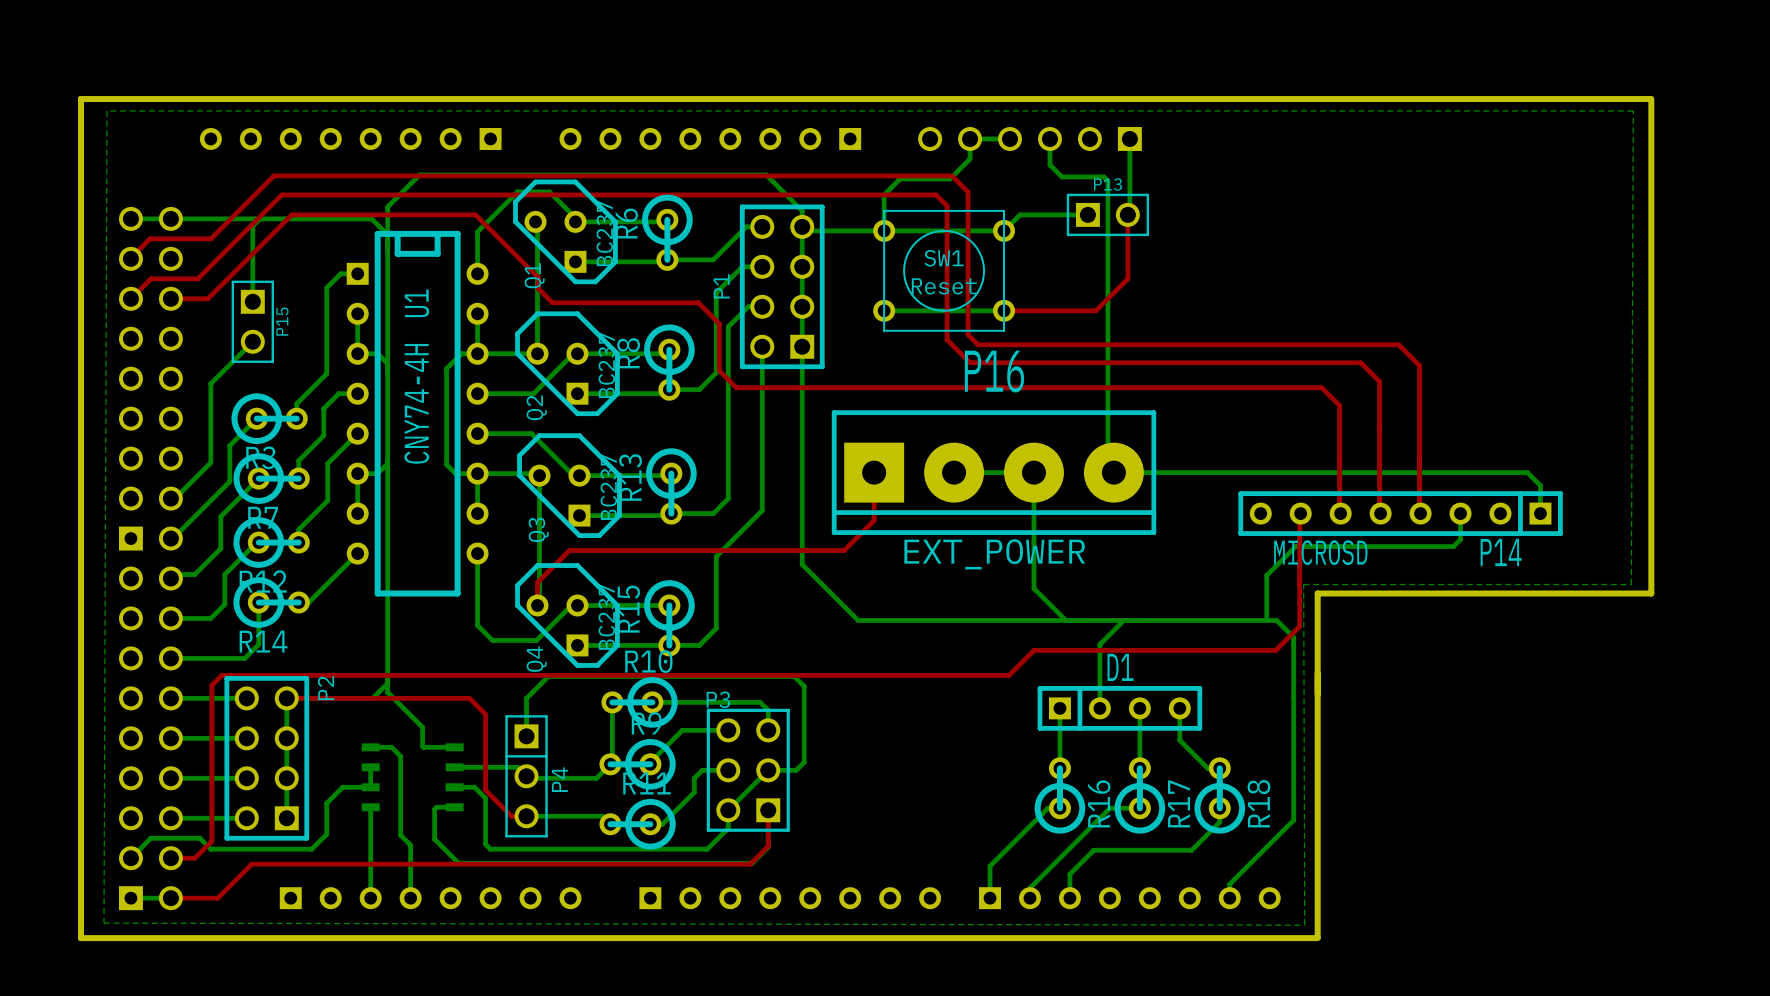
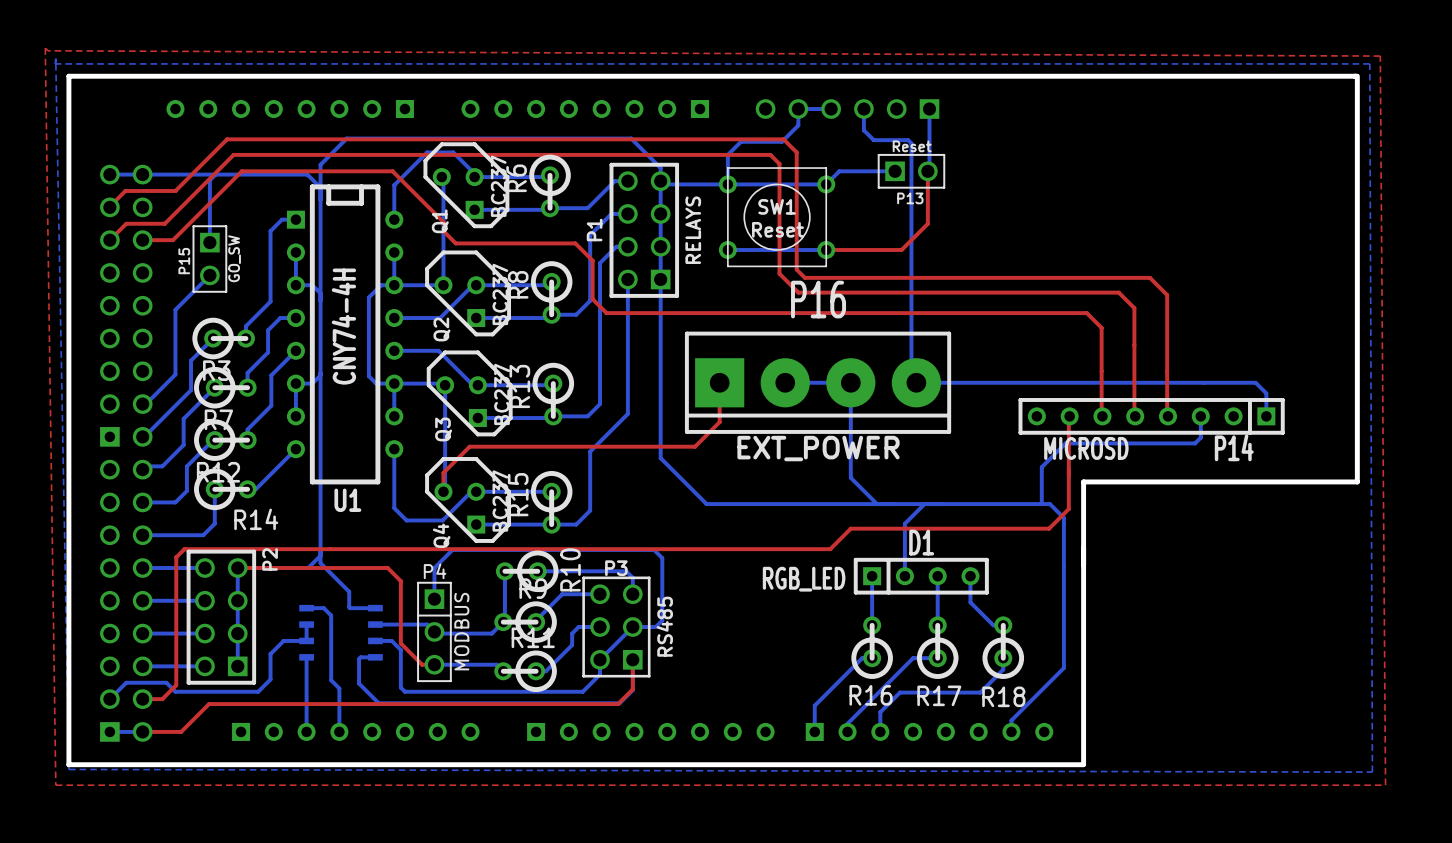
top zone outline: none -> (45, 48) (47, 50) (1380, 56) (1385, 785) (55, 785) (45, 48)
bottom zone outline: (106, 111) (1633, 111) (1631, 584) (1303, 584) (1304, 925) (103, 923) (106, 111) -> (55, 58) (55, 63) (1369, 63) (1372, 772) (68, 769) (55, 63) (55, 58)
P13 name position: P13 (1107, 184) -> P13 (910, 198)
P13 value: none -> Reset (912, 146)
P1 value: none -> RELAYS (693, 230)
U1 name rotation: 0° (416, 303) -> 90° clockwise (347, 500)
U1 name position: U1 (416, 303) -> U1 (347, 500)
P15 name position: P15 (282, 321) -> P15 (184, 261)
P15 value: none -> GO_SW (234, 258)
R14 name position: R14 (263, 641) -> R14 (256, 519)
R10 name rotation: 0° (648, 661) -> 90° counterclockwise (570, 569)
P3 name position: P3 (718, 699) -> P3 (616, 568)
D1 value: none -> RGB_LED (804, 579)
P3 value: none -> RS485 (664, 626)
P4 value: none -> MODBUS (461, 631)
P4 name rotation: 0° (559, 779) -> 90° clockwise (435, 571)
P4 name position: P4 (559, 779) -> P4 (435, 571)
R16 name rotation: 0° (1099, 803) -> 90° clockwise (871, 695)
R17 name rotation: 0° (1179, 803) -> 90° clockwise (939, 695)
R18 name rotation: 0° (1258, 803) -> 90° clockwise (1003, 696)

